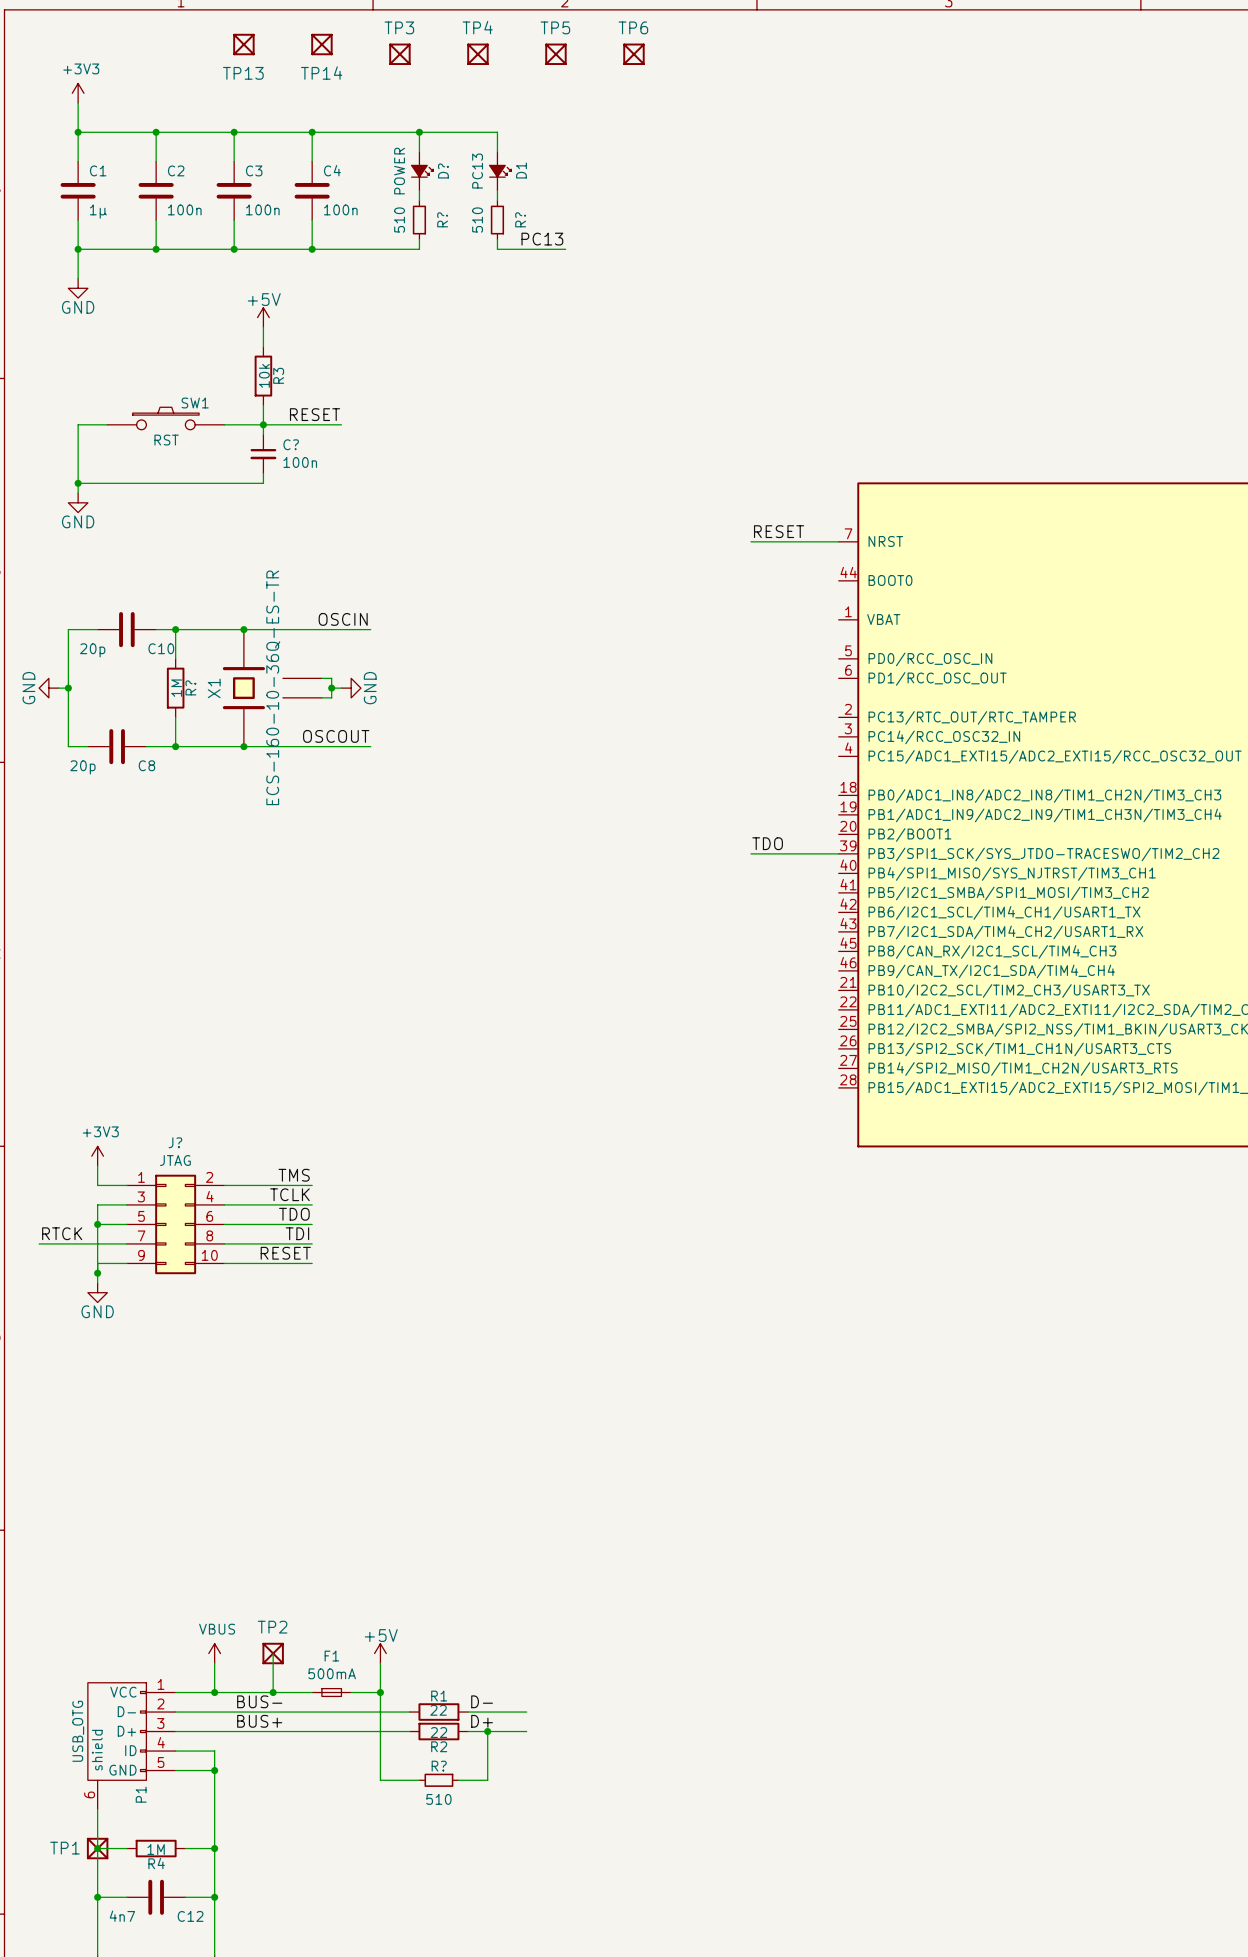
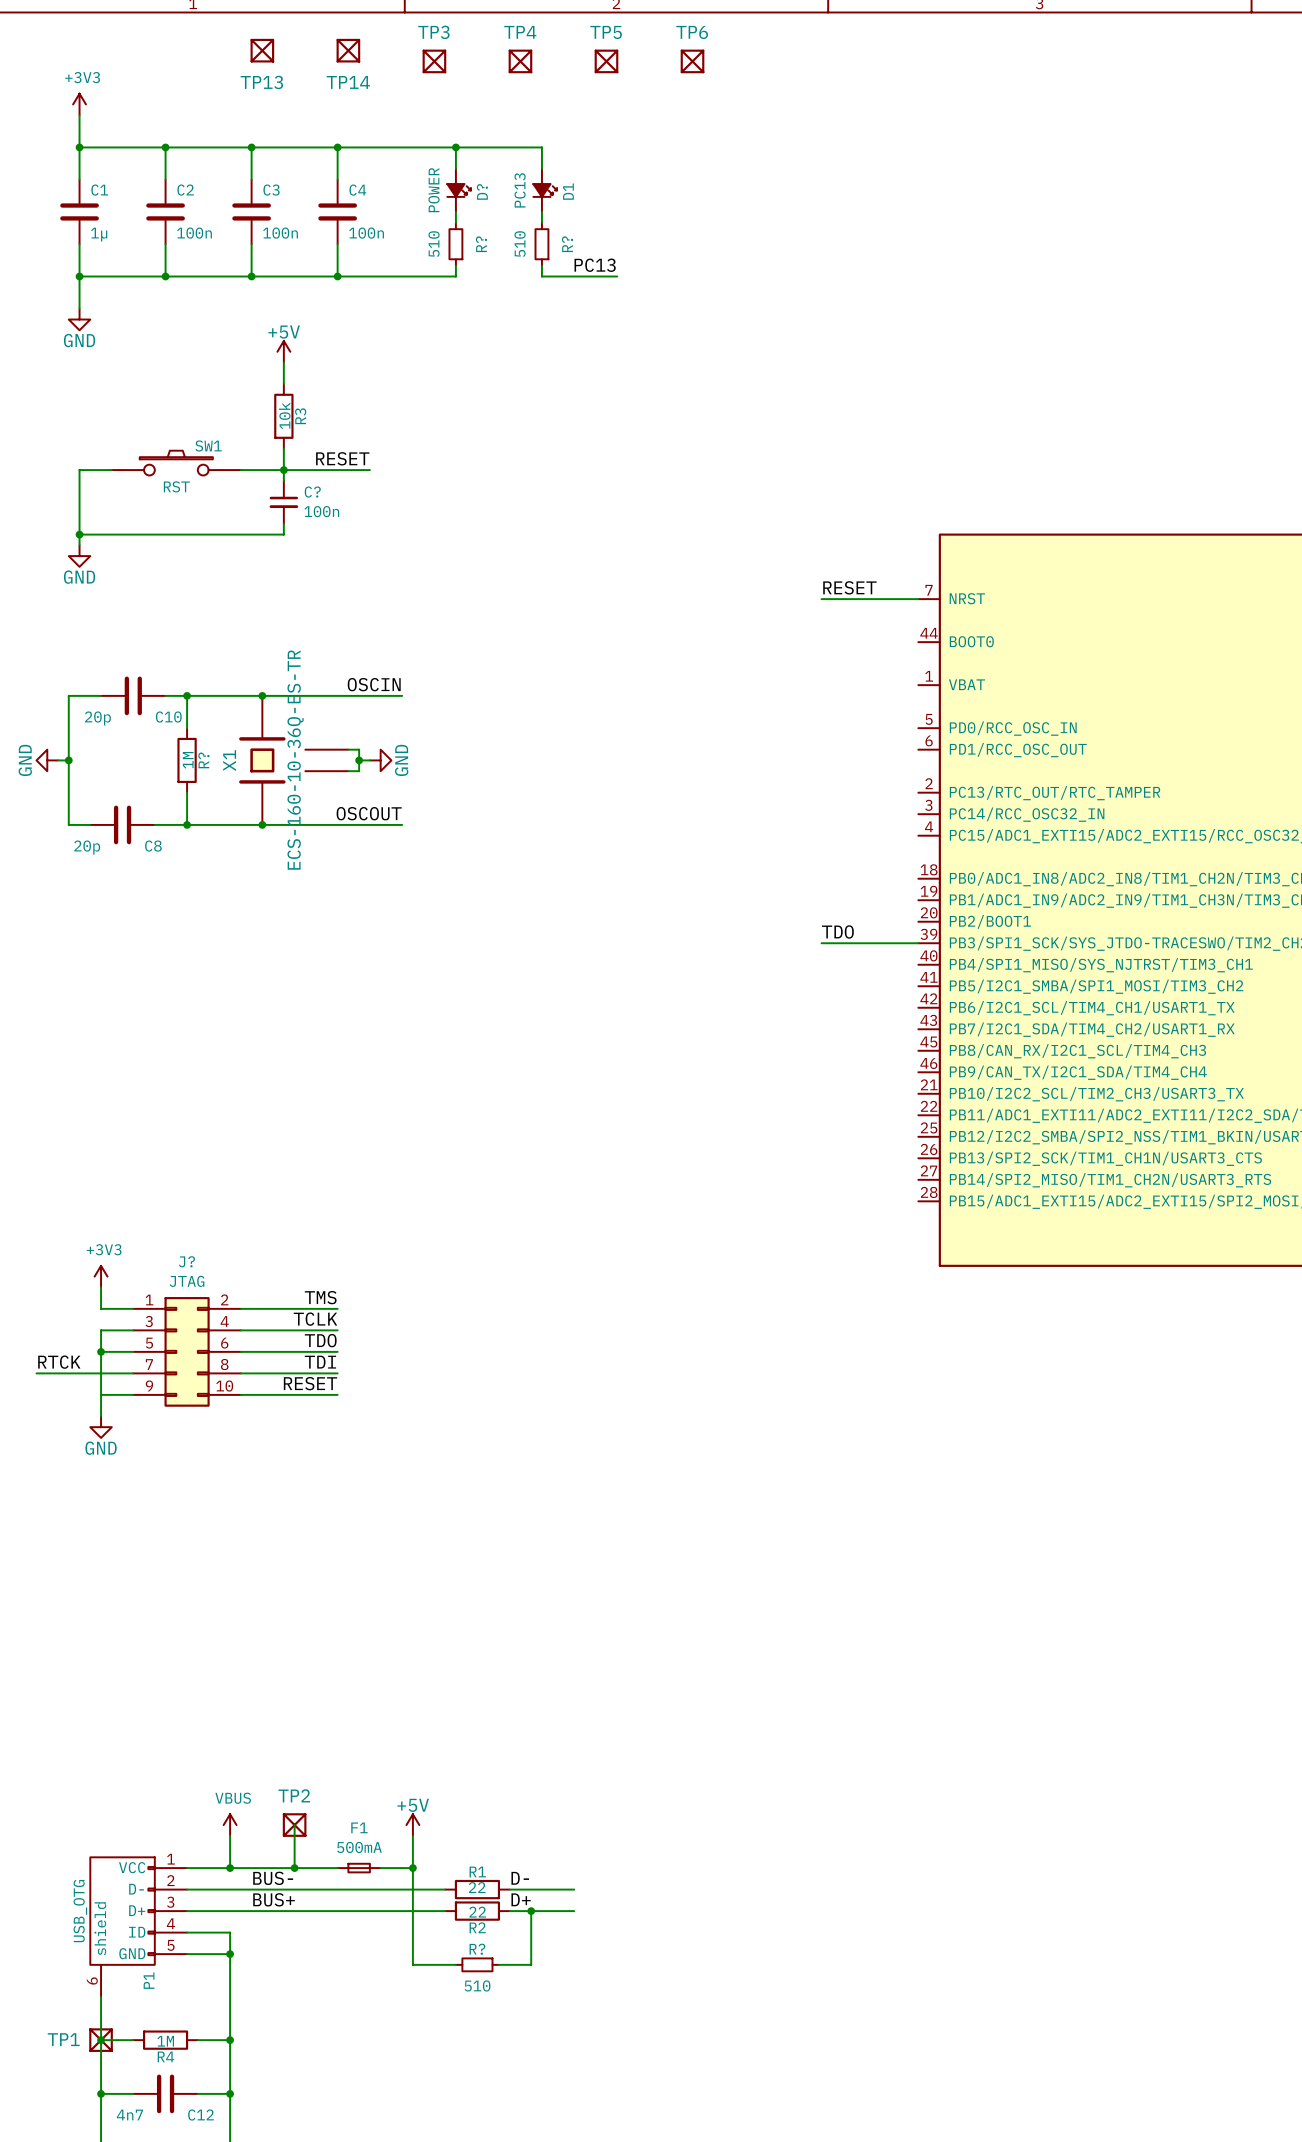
junction: (97, 1273) -> none

